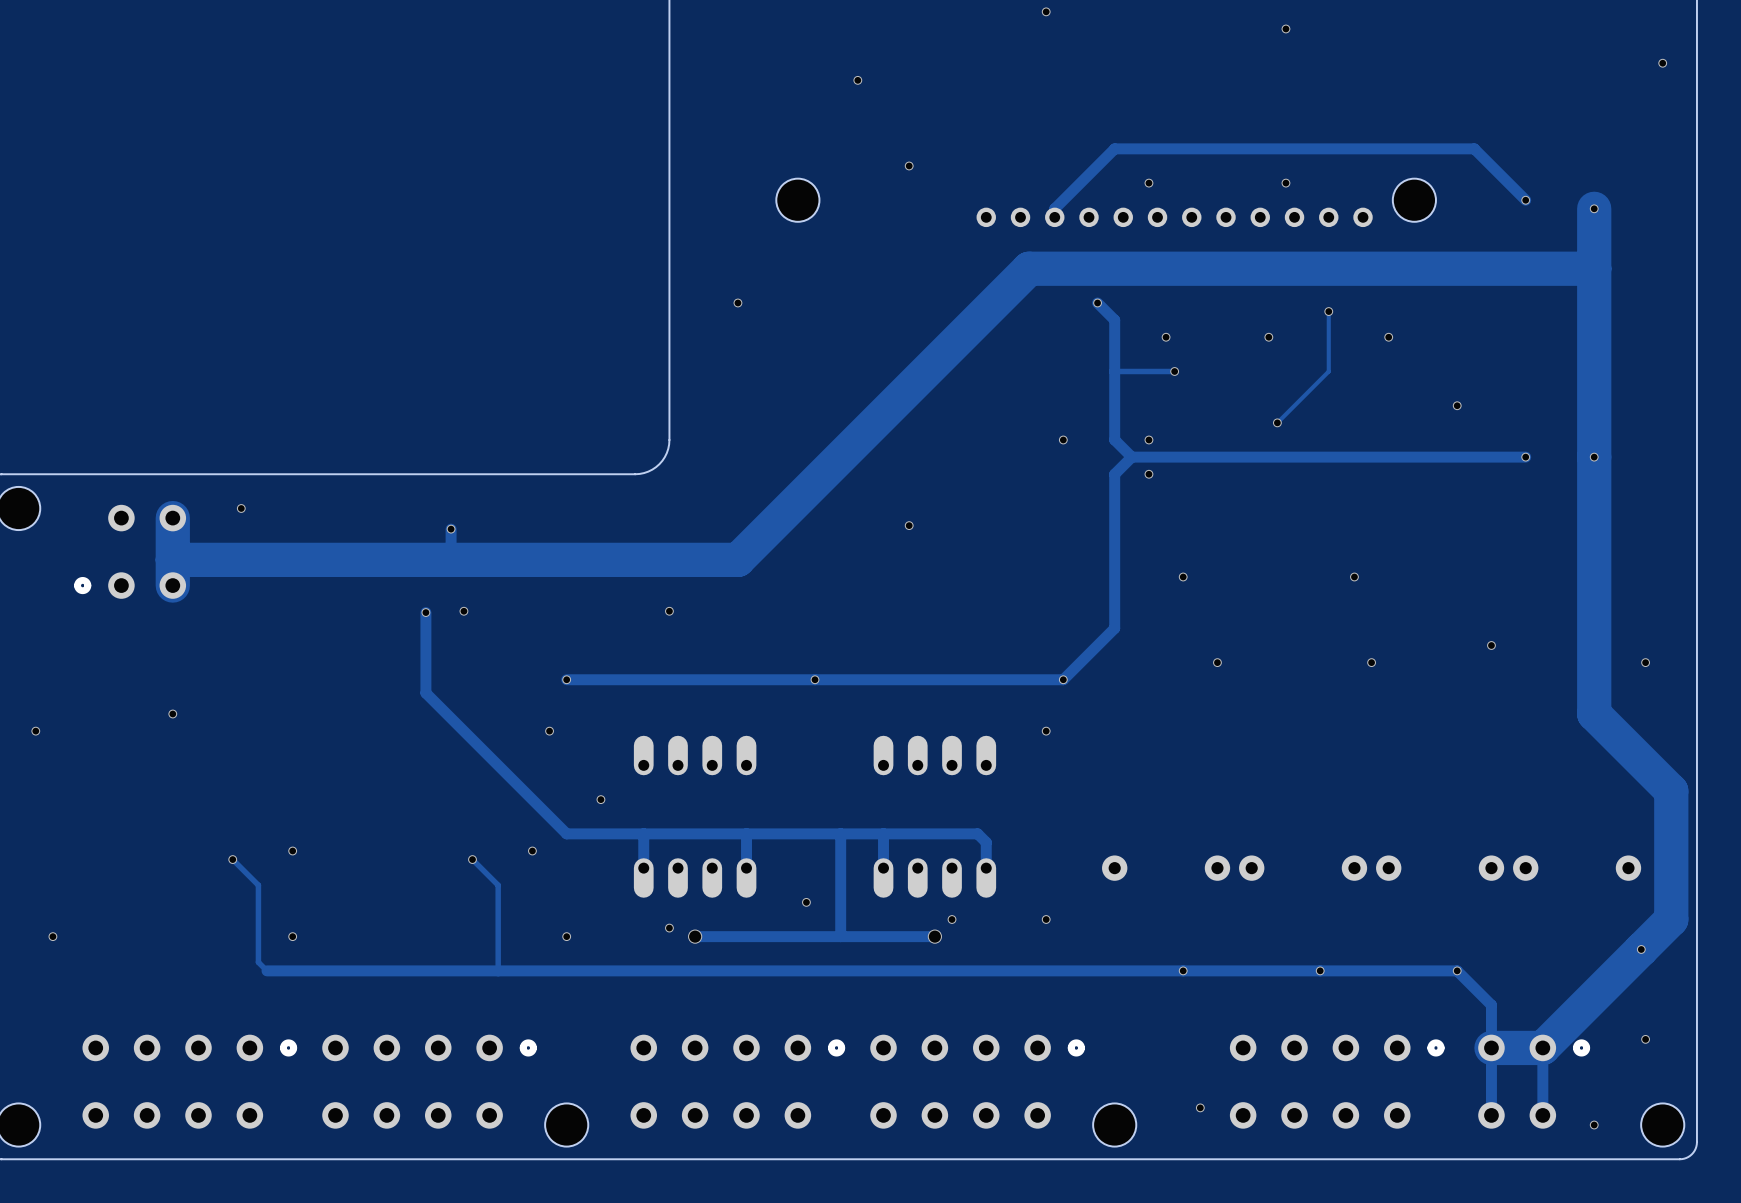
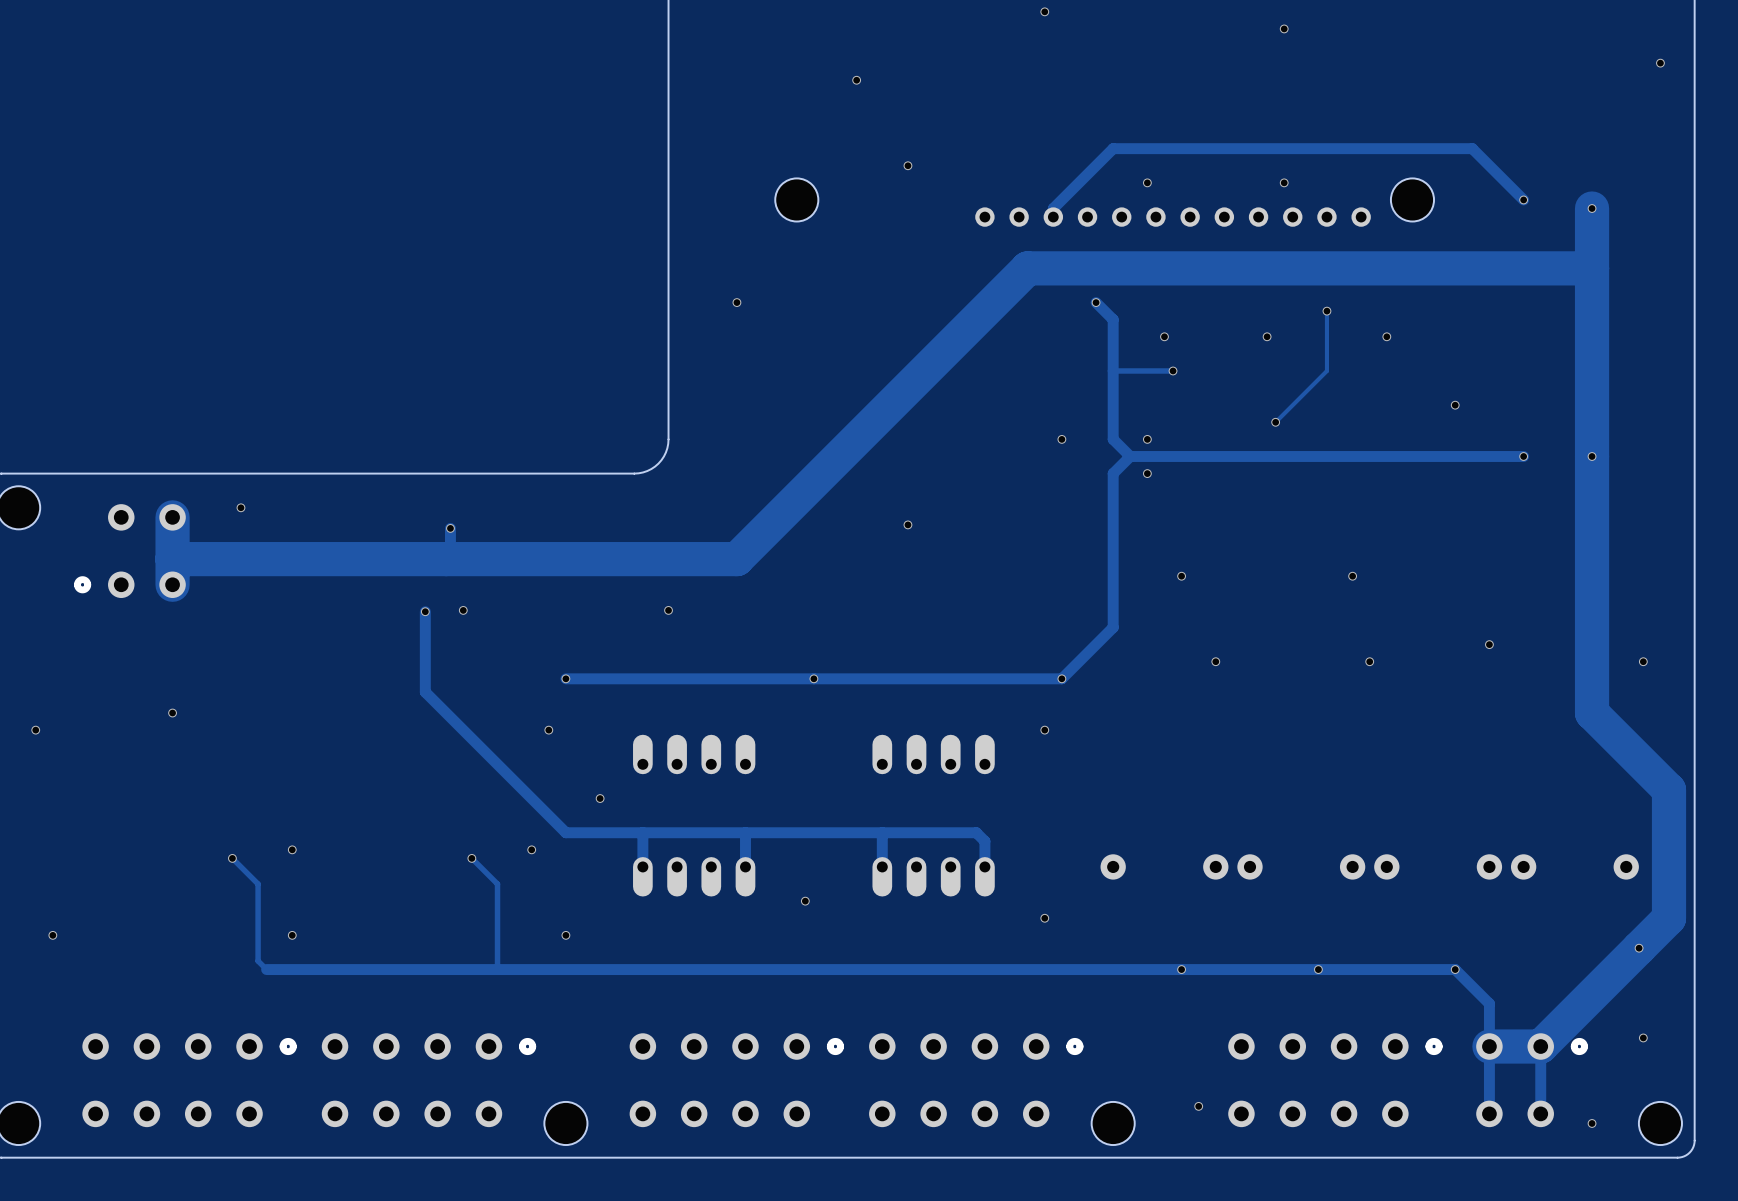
track: (840, 833) (840, 936) -> none
via: (952, 919) -> none
via: (669, 928) -> none
via: (695, 936) -> none
track: (934, 936) (695, 936) -> none
via: (934, 936) -> none

